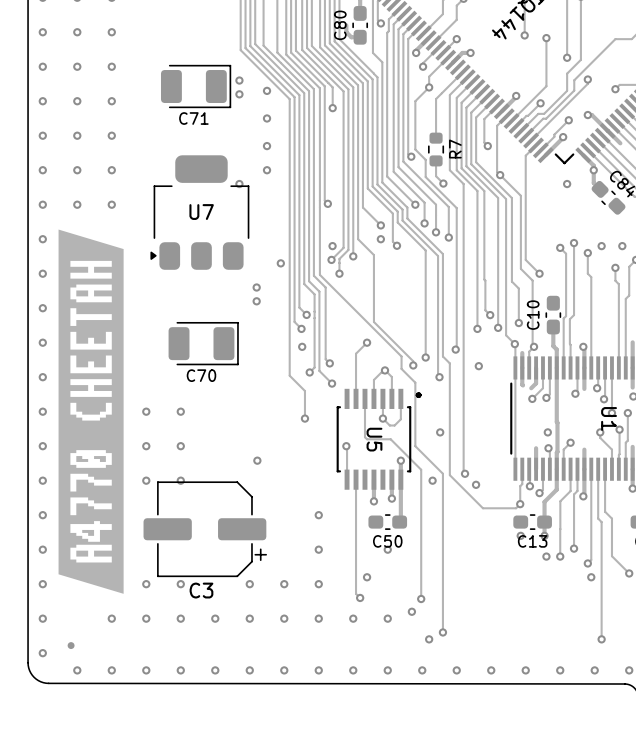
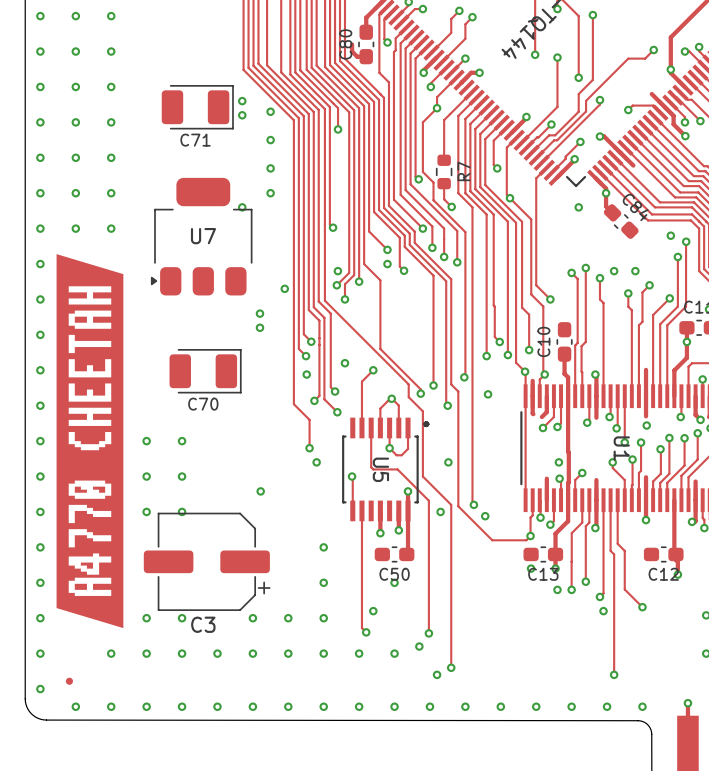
via: none -> (344, 363)
via: none -> (316, 462)

